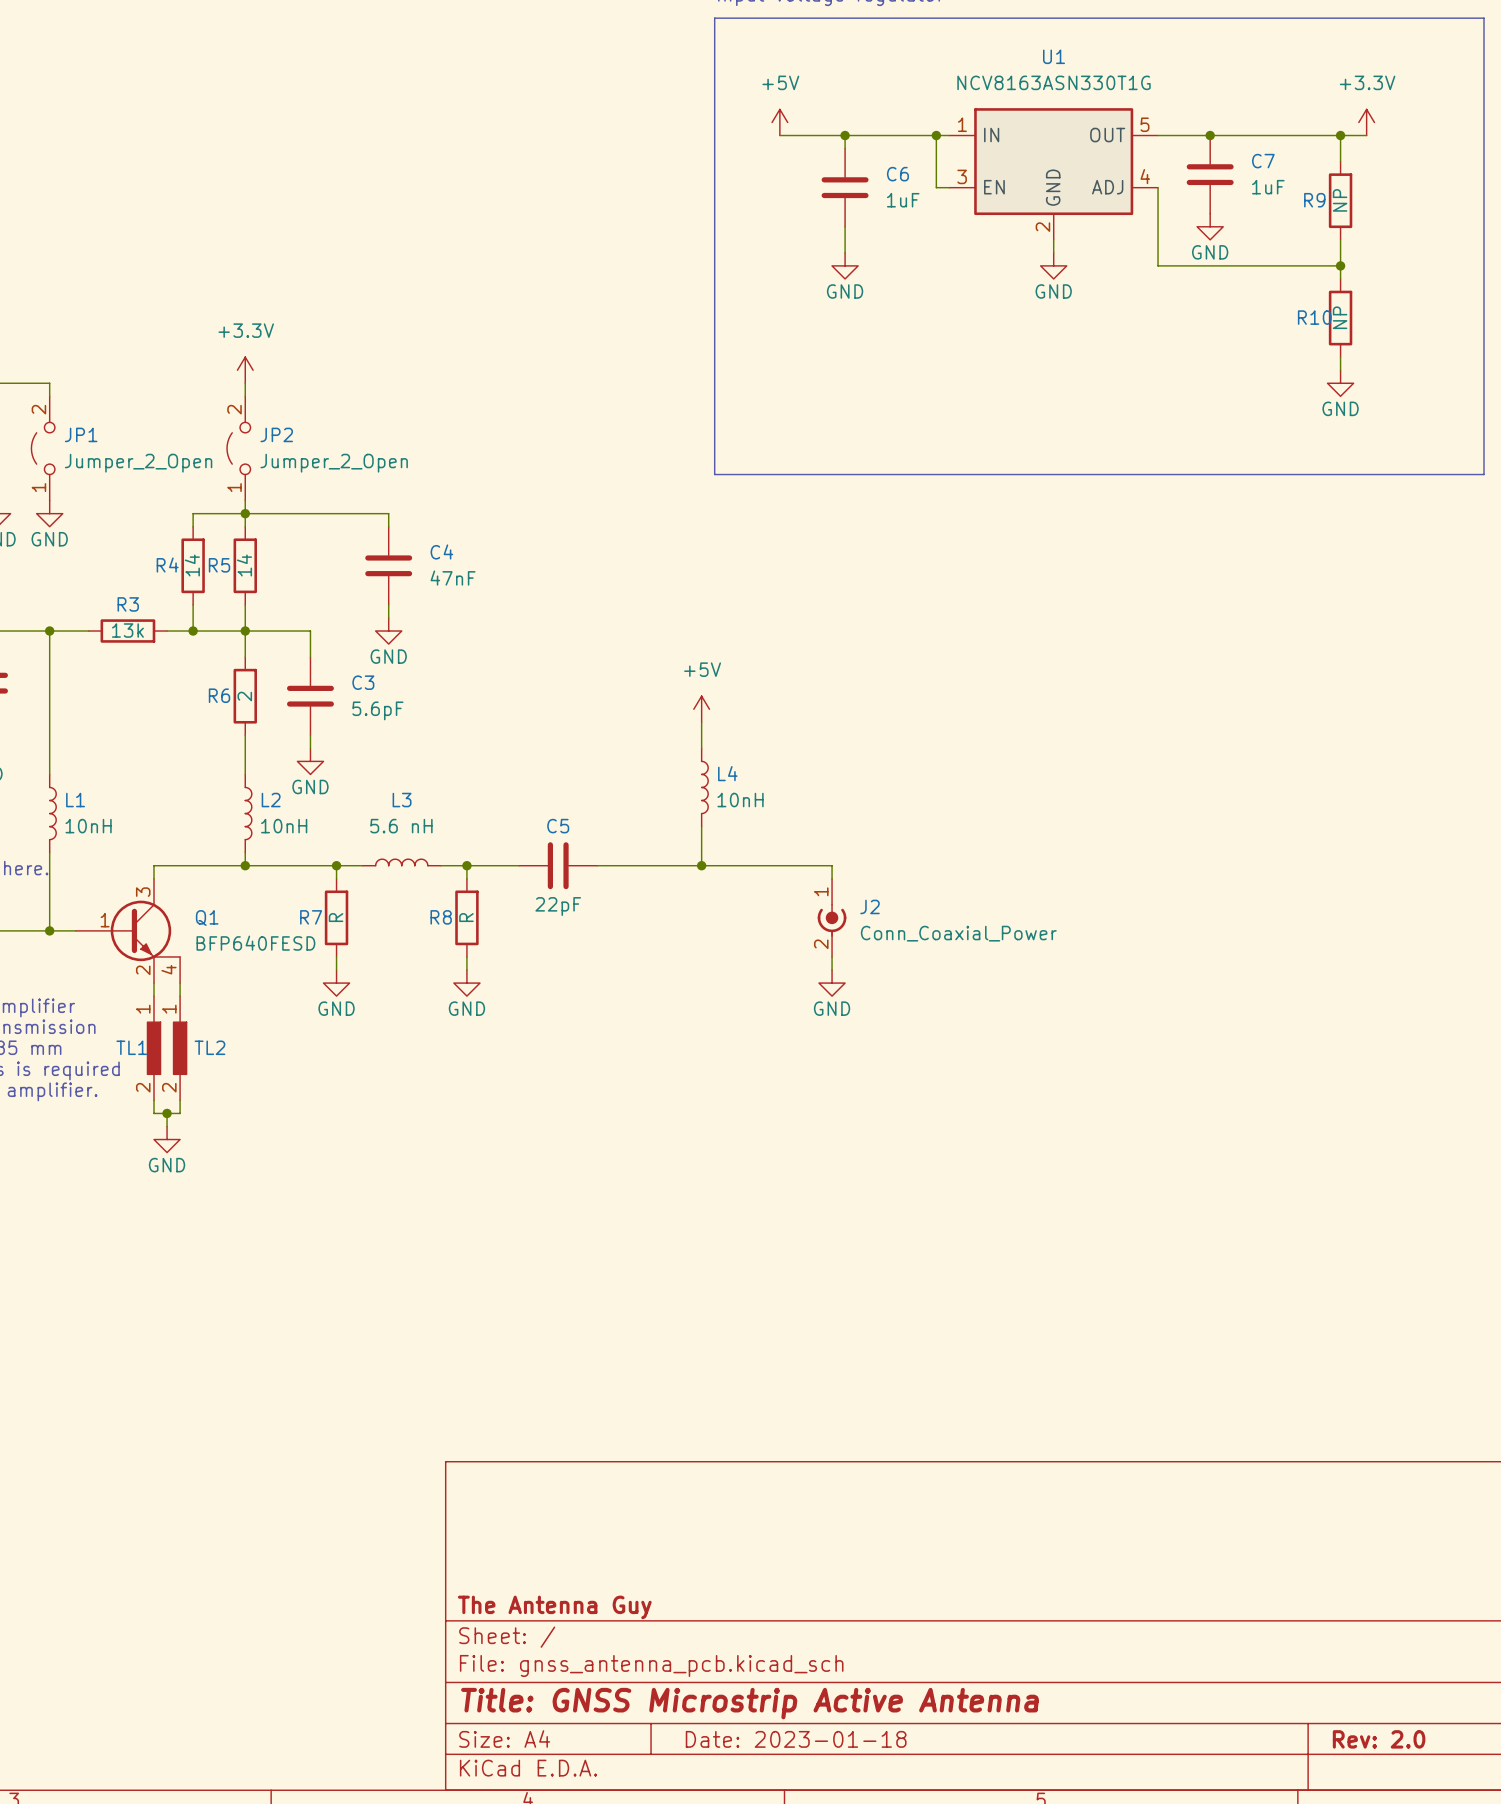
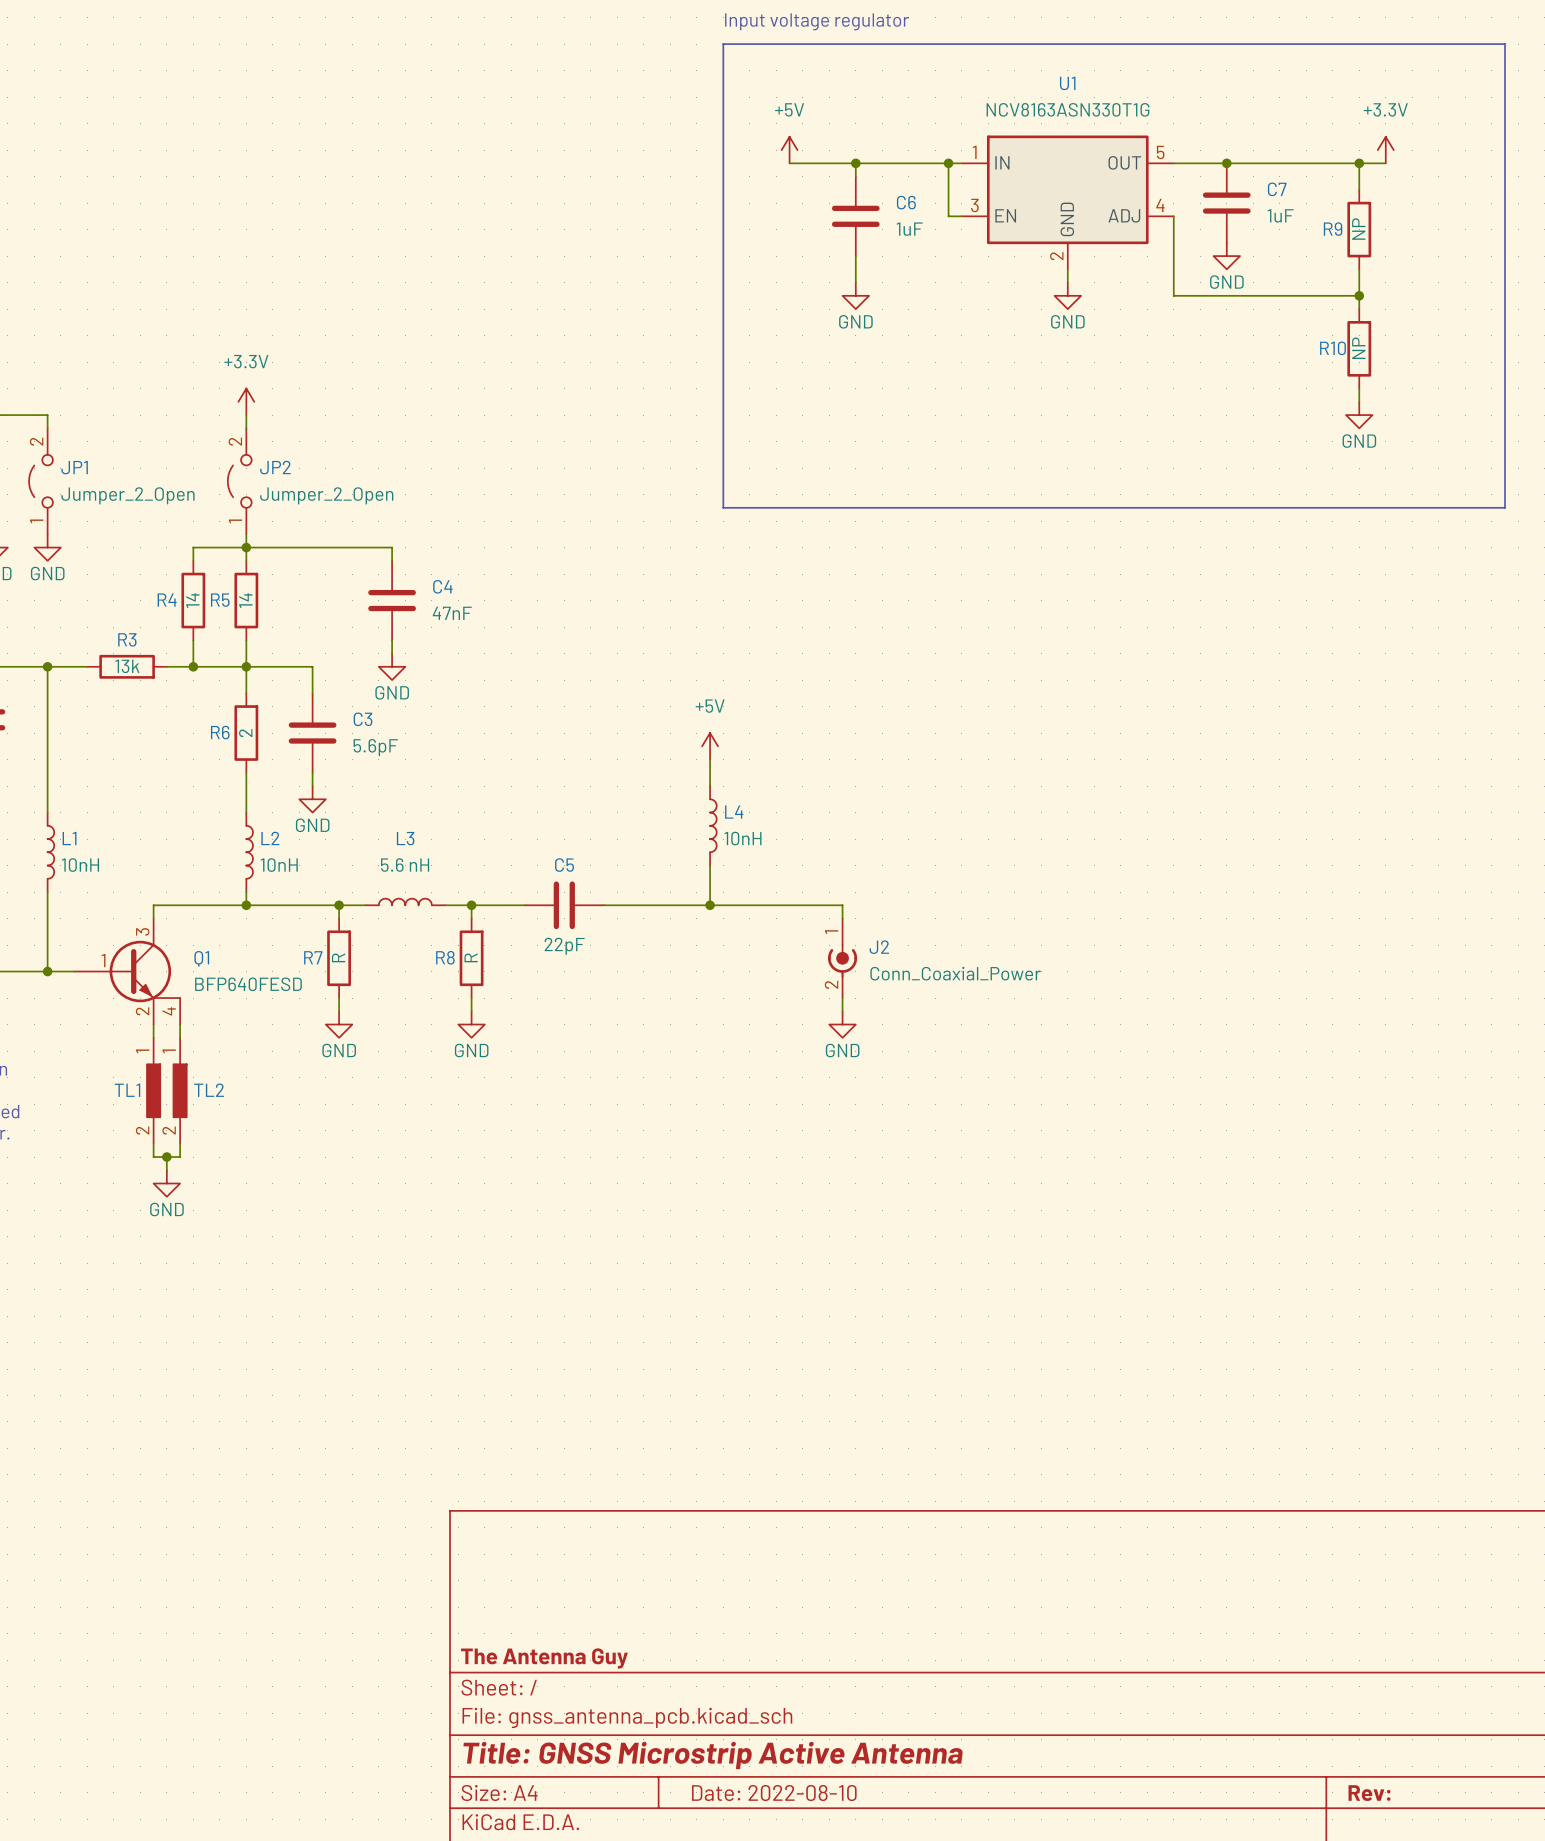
title block: Date: 2023-01-18 (796, 1739) -> Date: 2022-08-10 (774, 1793)
title block: Rev: 2.0 (1379, 1739) -> Rev: (1369, 1793)

